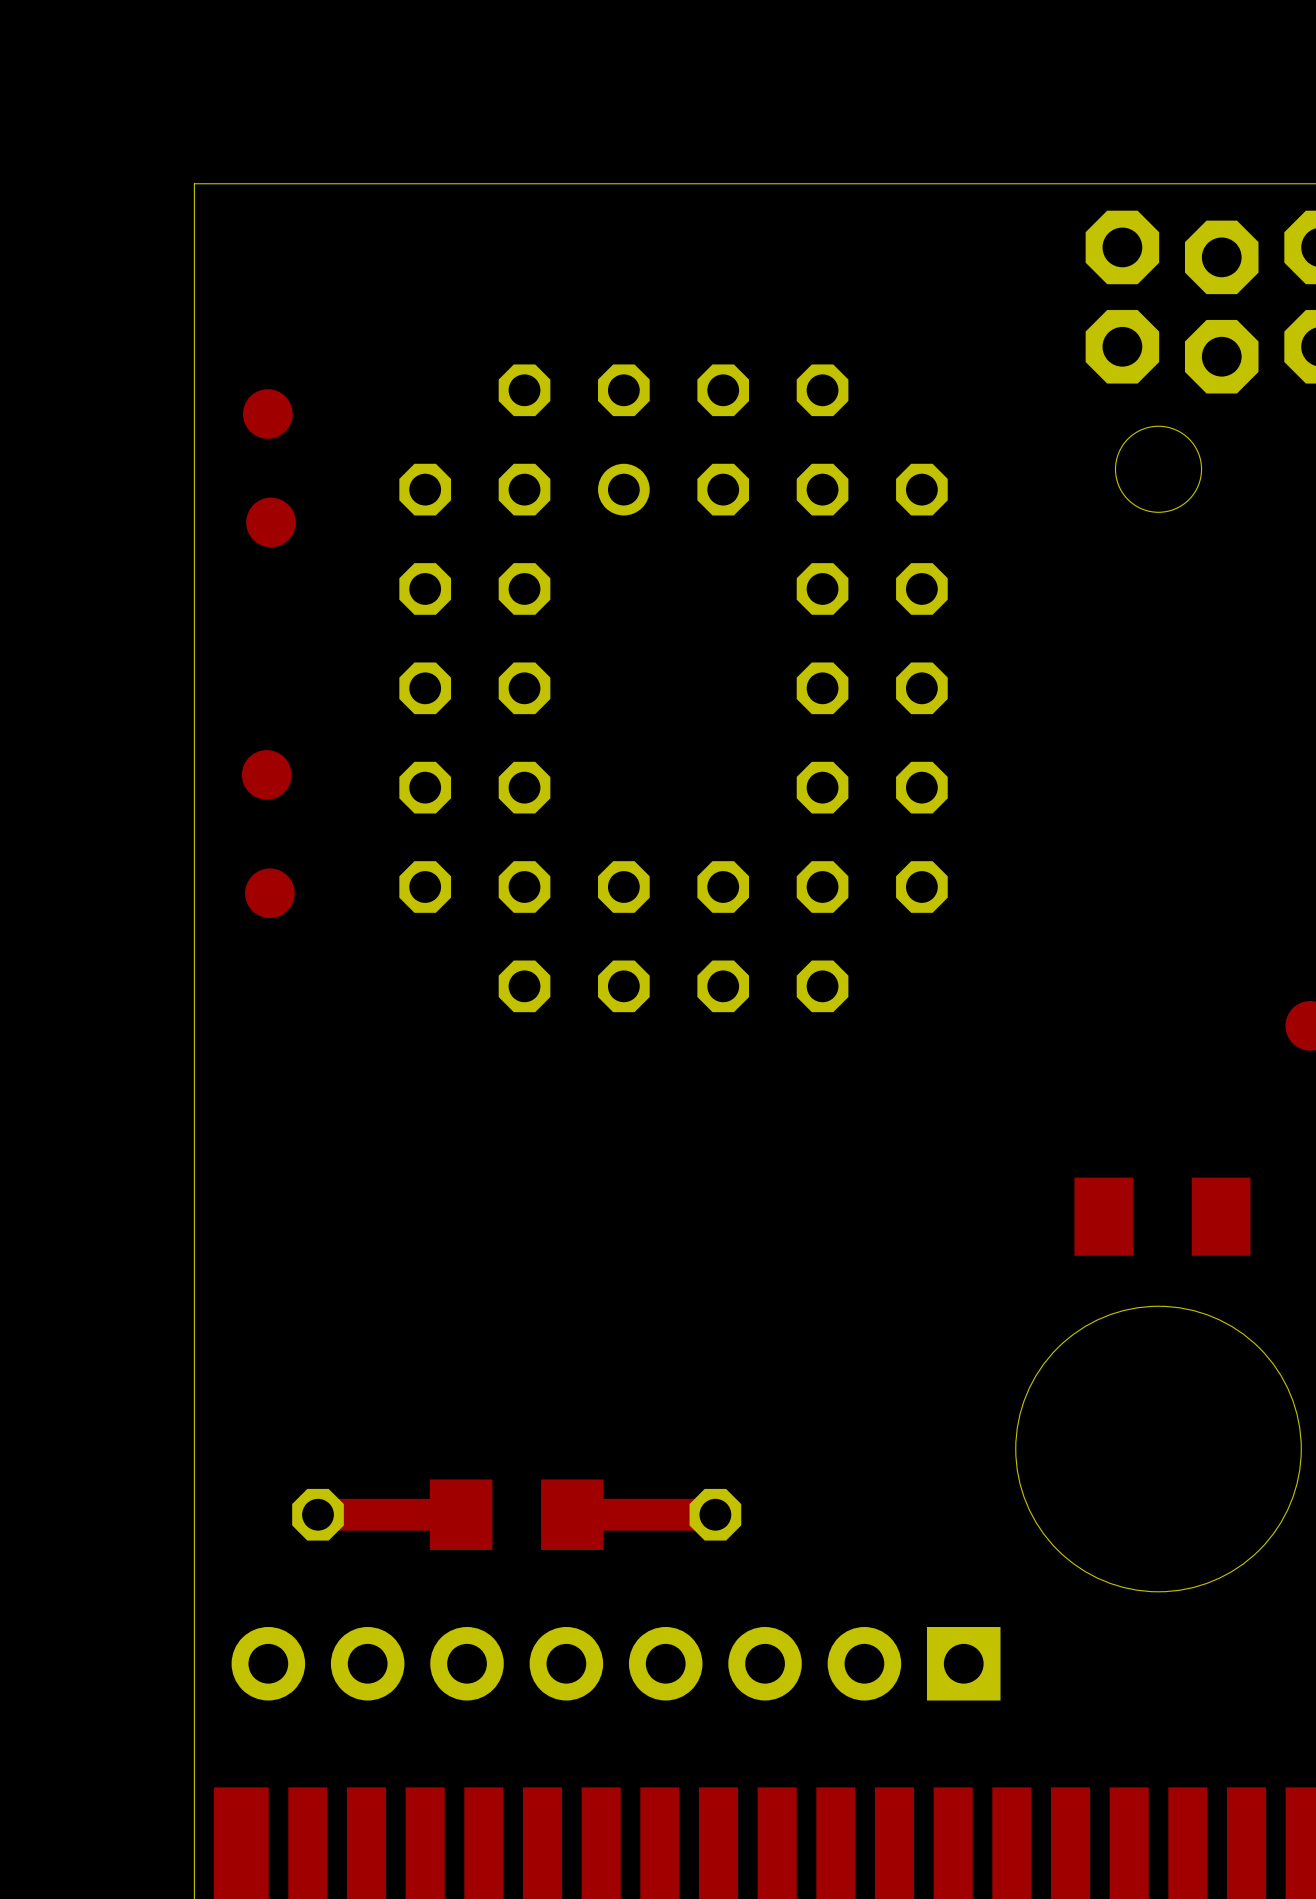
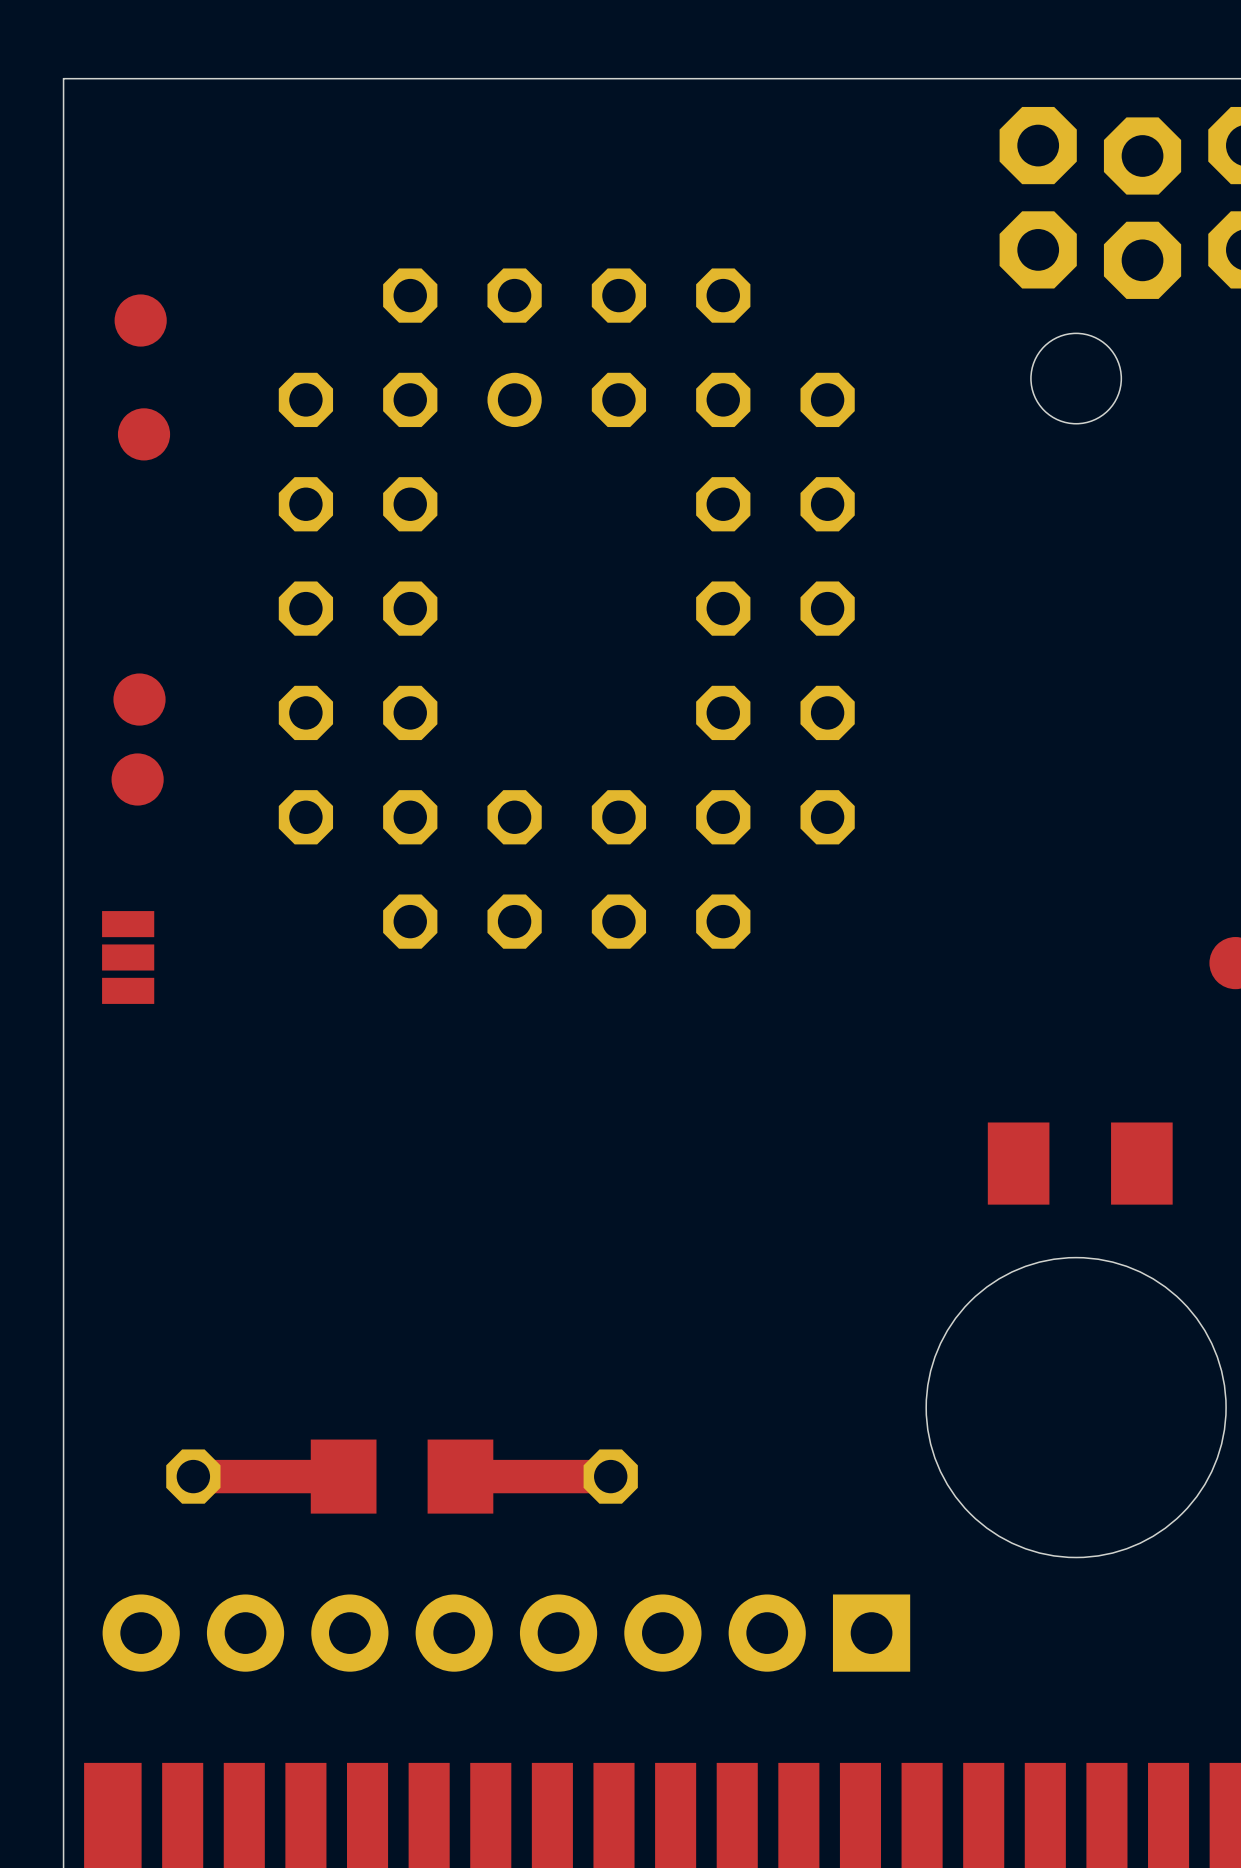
part position: (269, 893) -> (137, 779)
part: none -> (128, 957)

